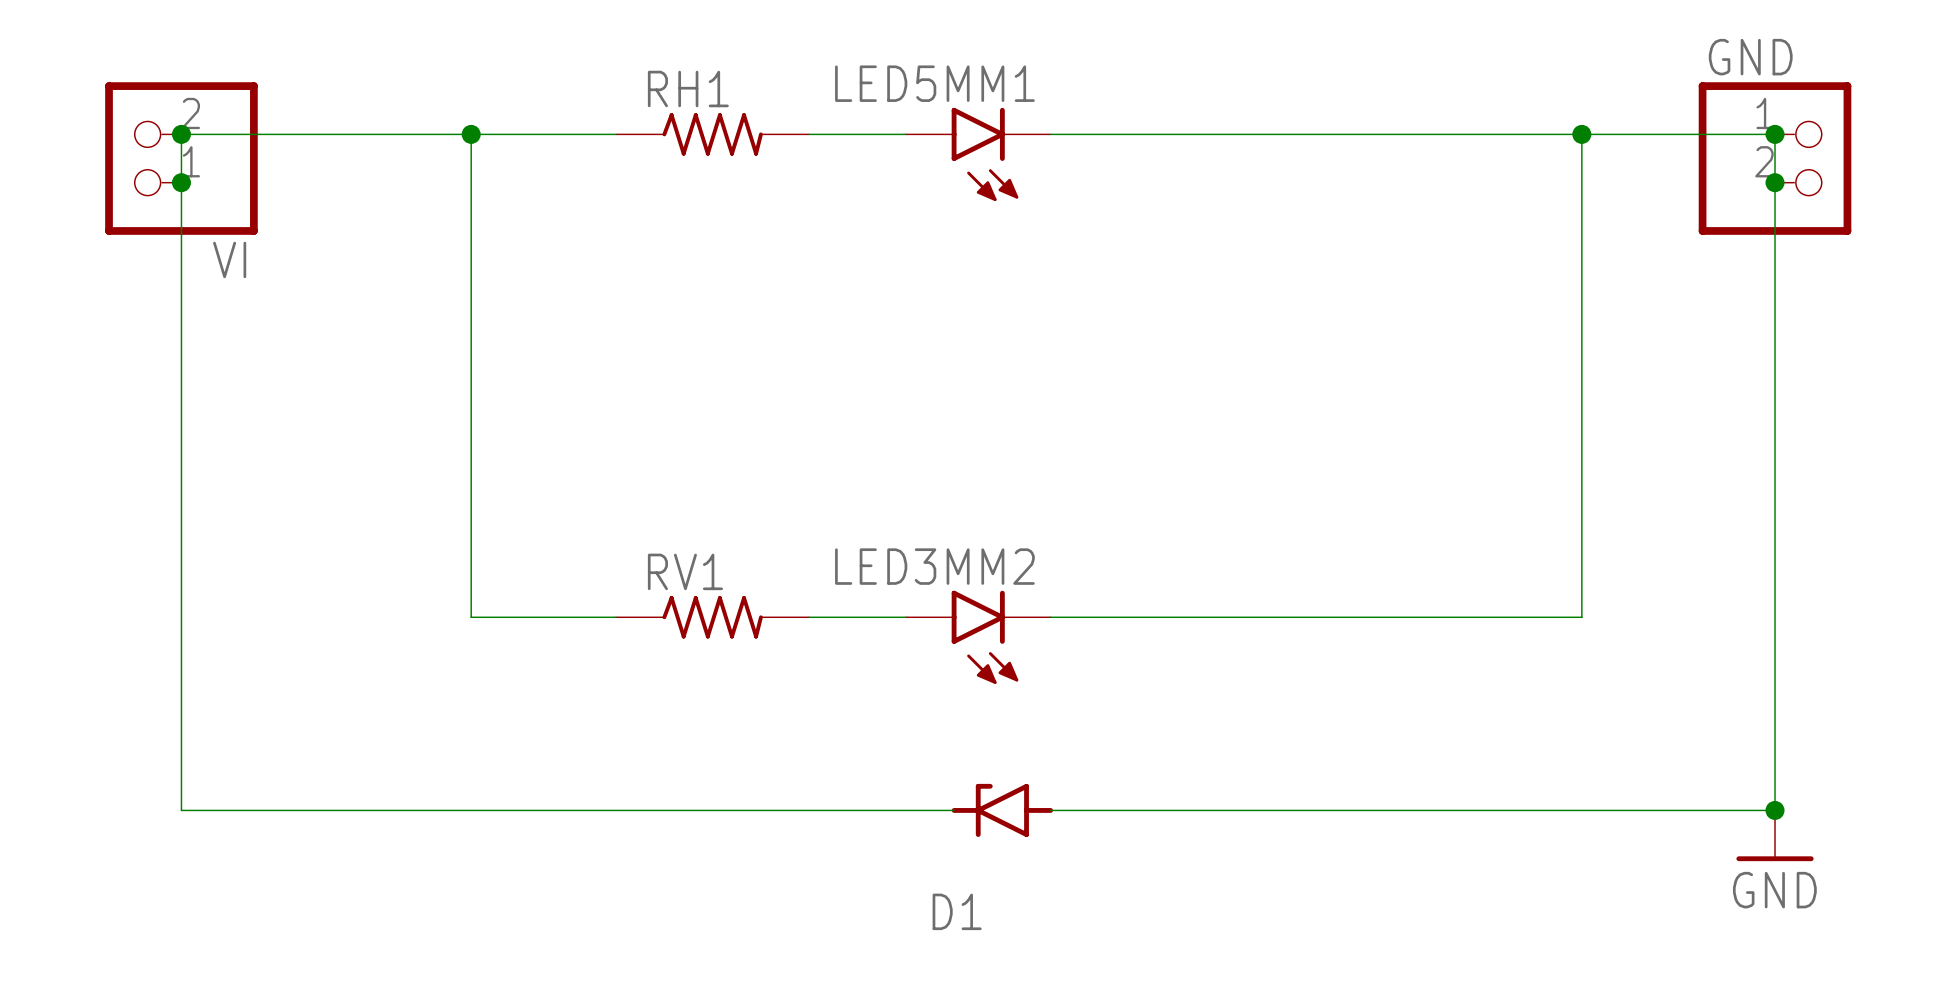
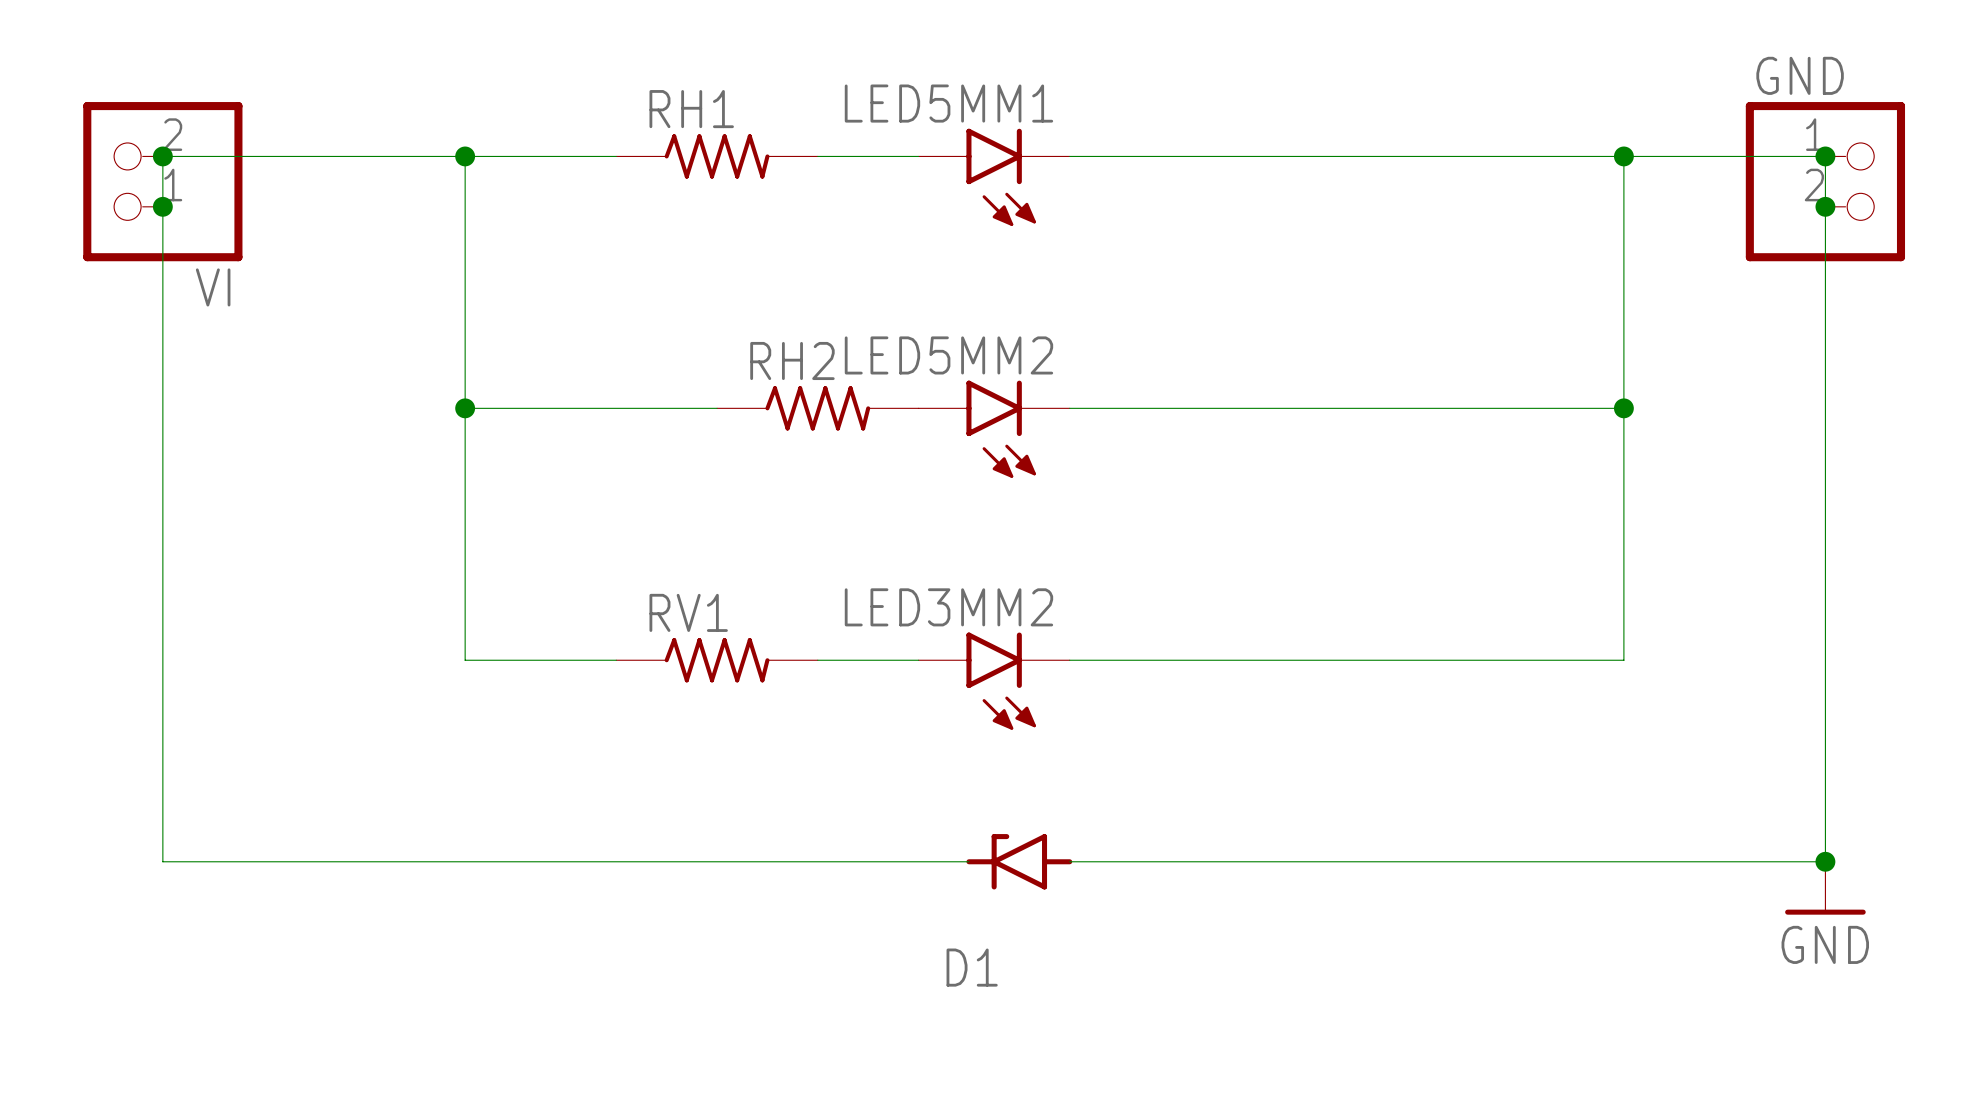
wire: none -> (465, 408) (717, 408)
junction: none -> (465, 408)
RH2: none -> (817, 408)
wire: none -> (1069, 408) (1623, 408)
junction: none -> (1623, 408)
LED5MM2: none -> (994, 429)

